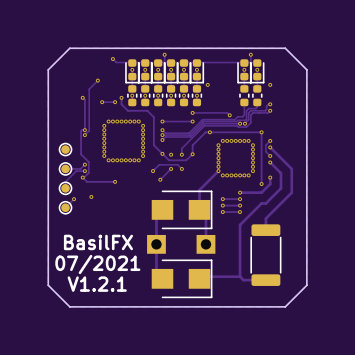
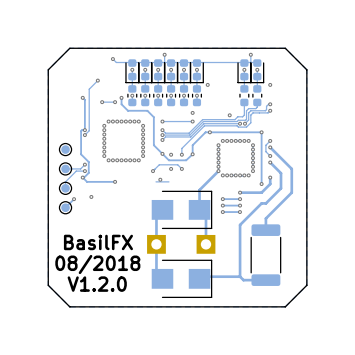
track: (192, 112) (227, 112) (229, 115) -> none
track: (171, 168) (160, 179) -> none
track: none -> (168, 181) (156, 181)
text: 07/2021 (97, 264) -> 08/2018 (97, 264)
text: V1.2.1 (97, 284) -> V1.2.0 (97, 284)

